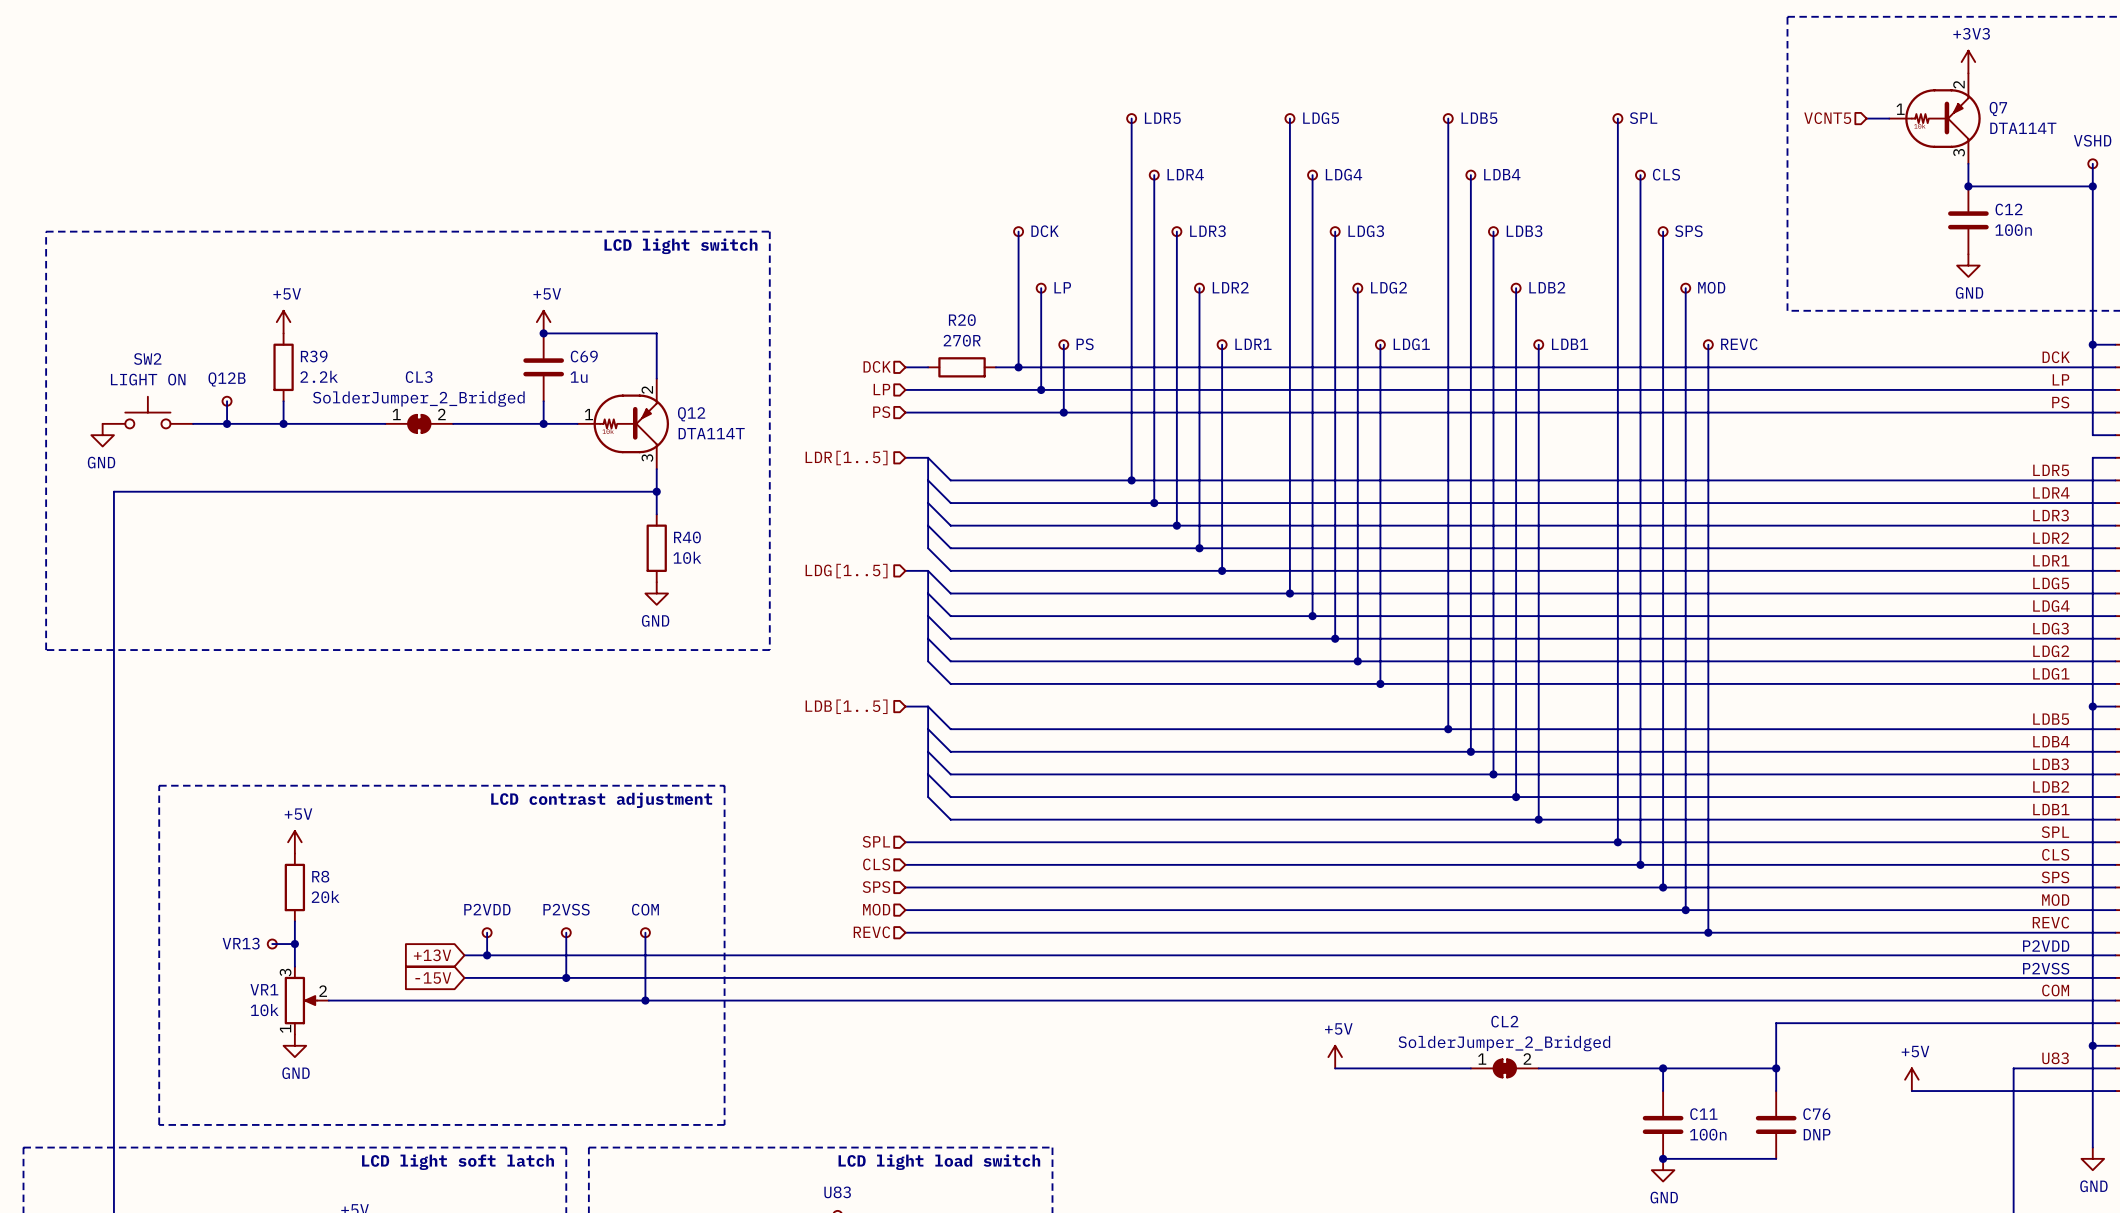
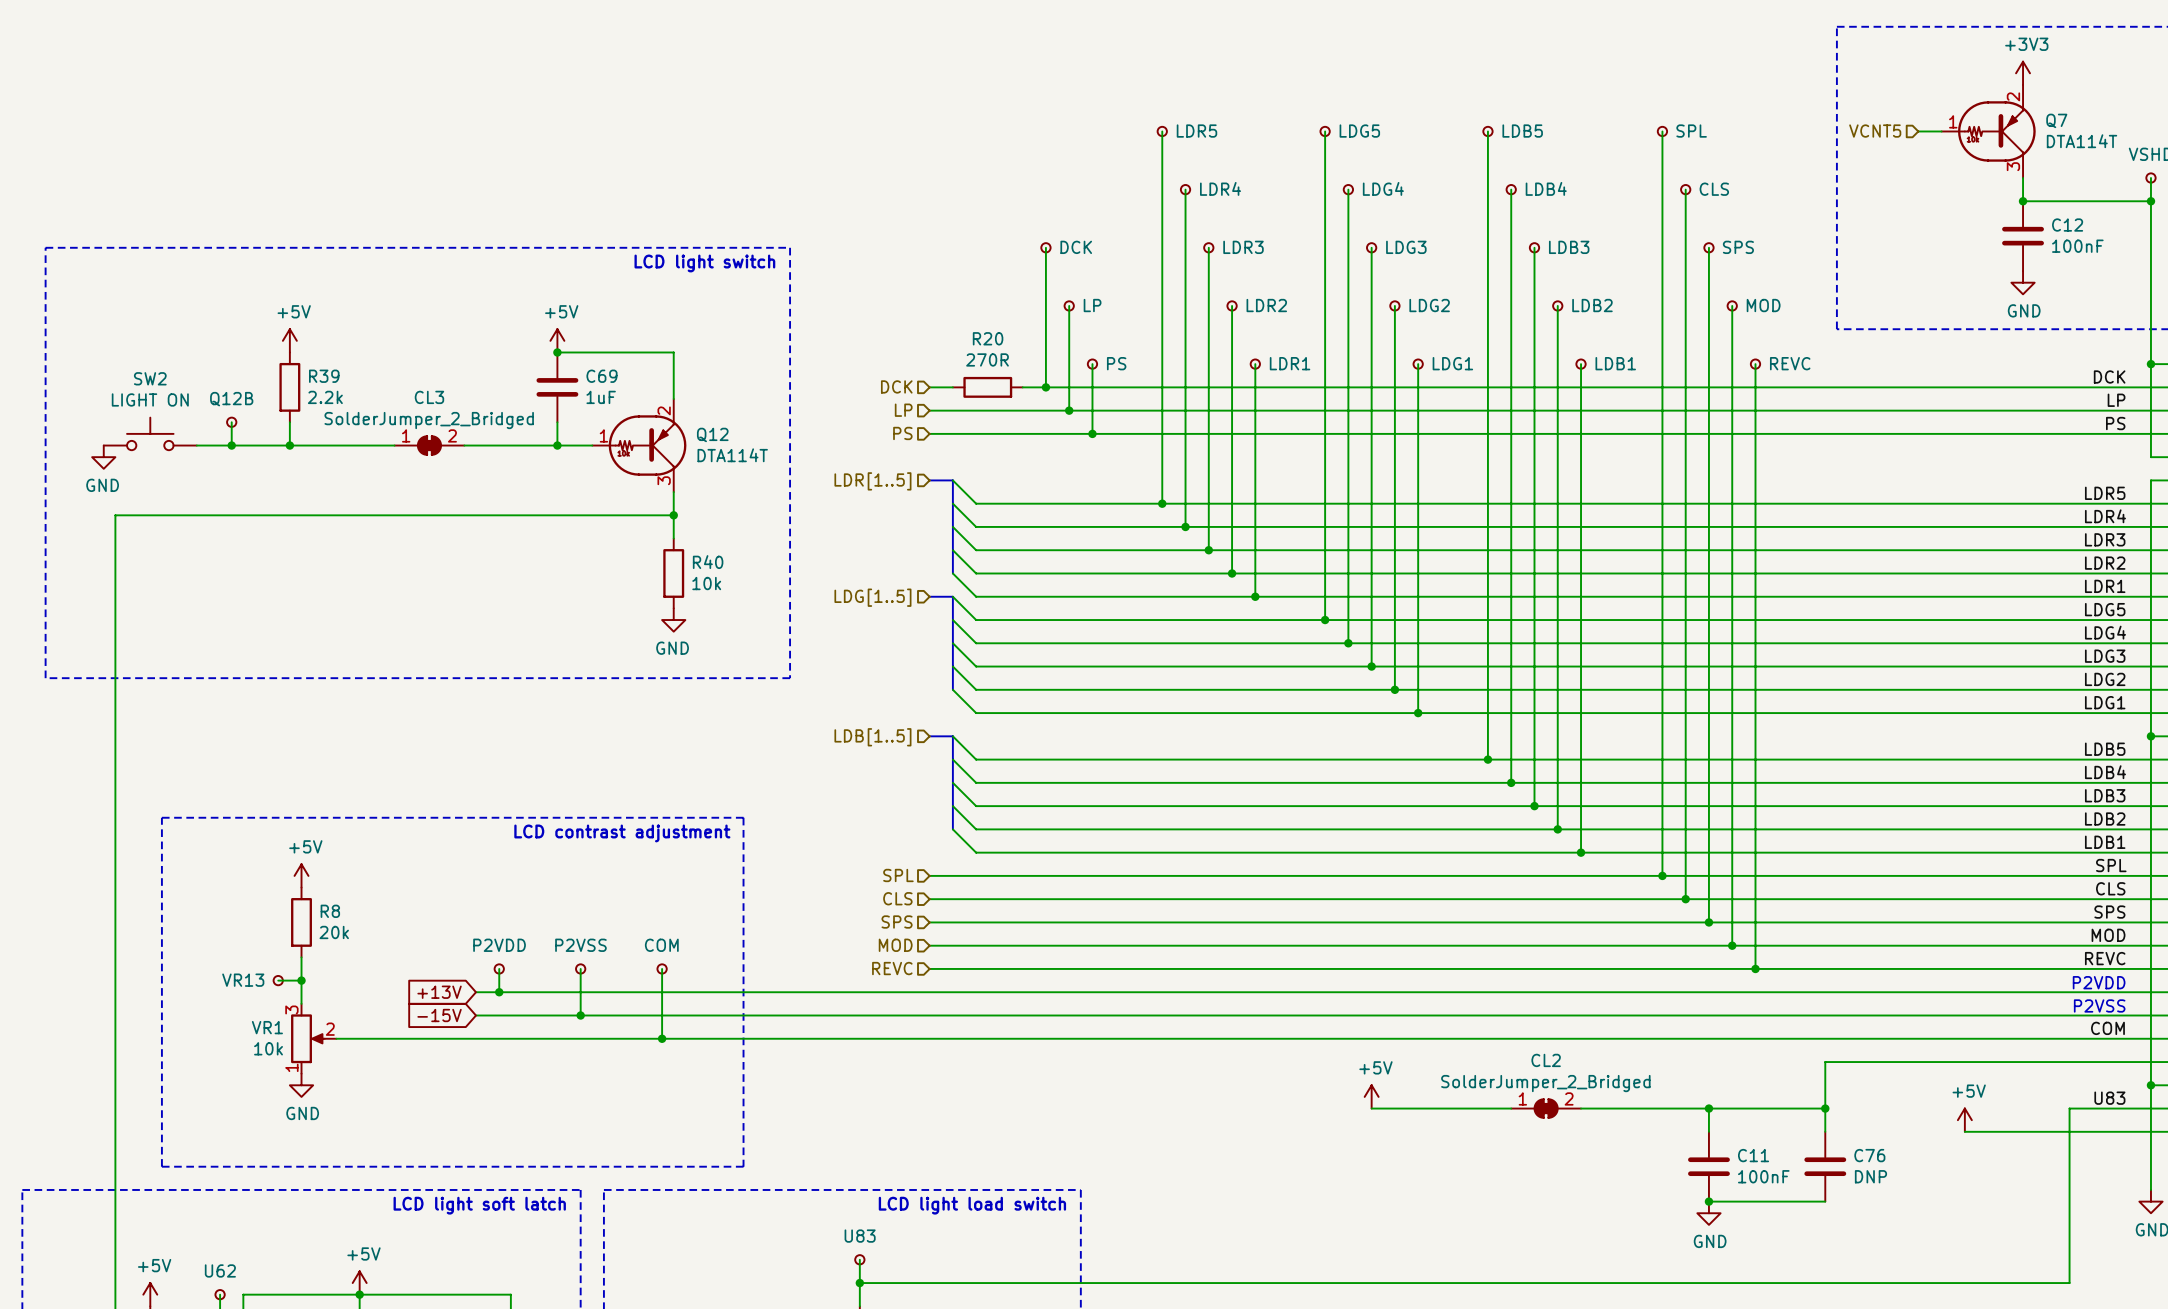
C12 value: 100n (2013, 230) -> 100nF (2077, 246)
C69 value: 1u (579, 377) -> 1uF (601, 397)
C11 value: 100n (1708, 1134) -> 100nF (1763, 1176)

